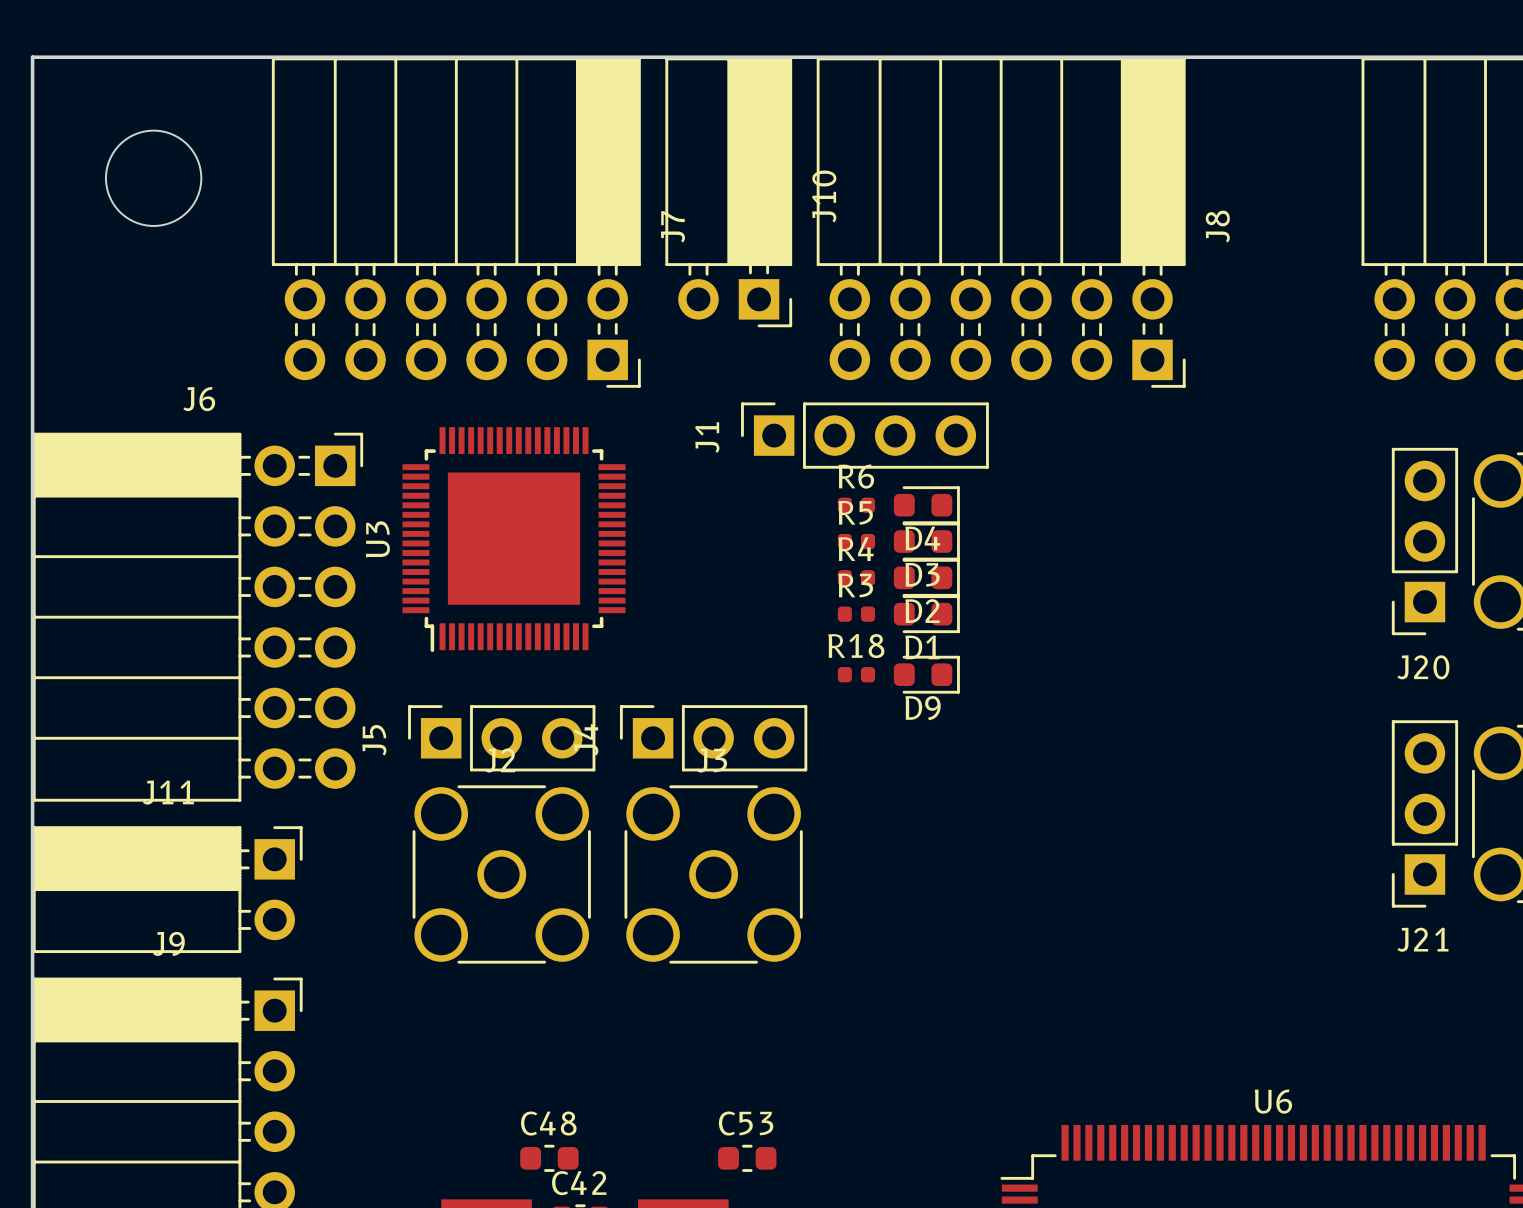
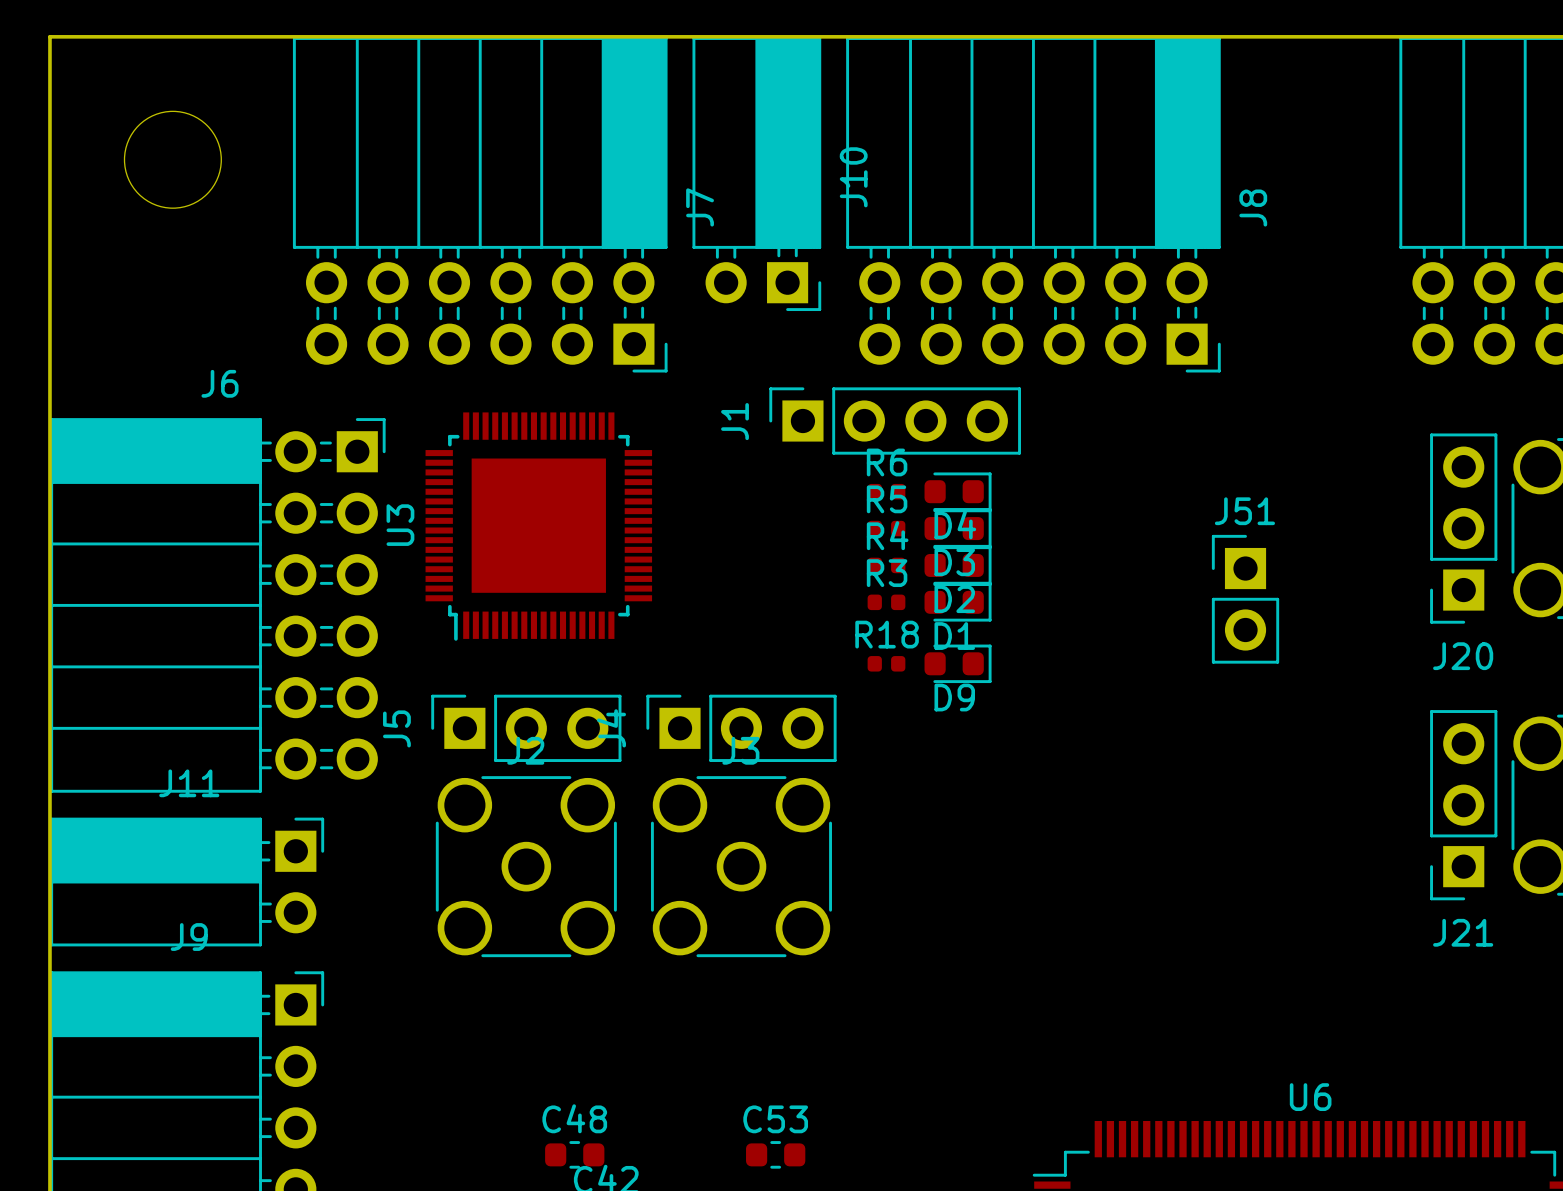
J51: none -> (1245, 599)

